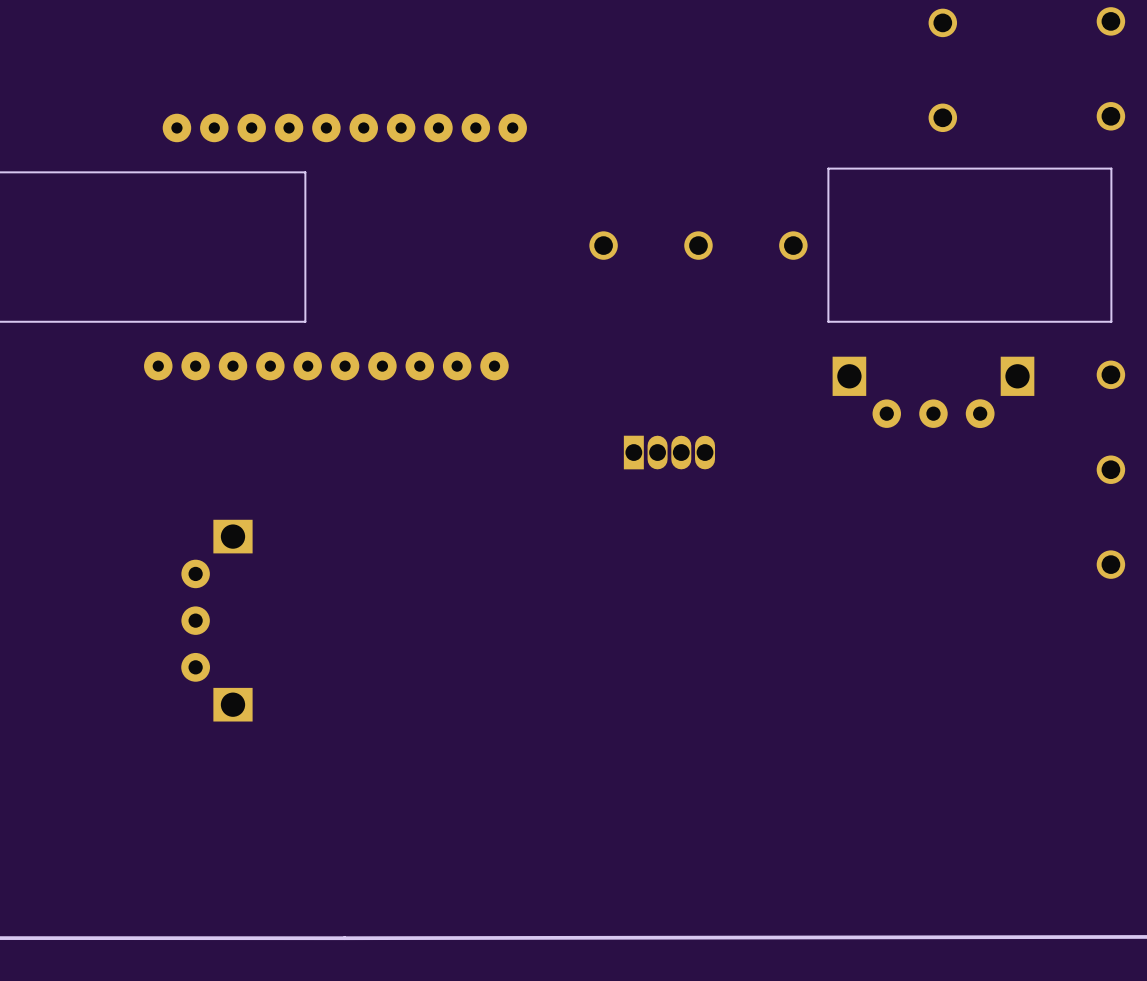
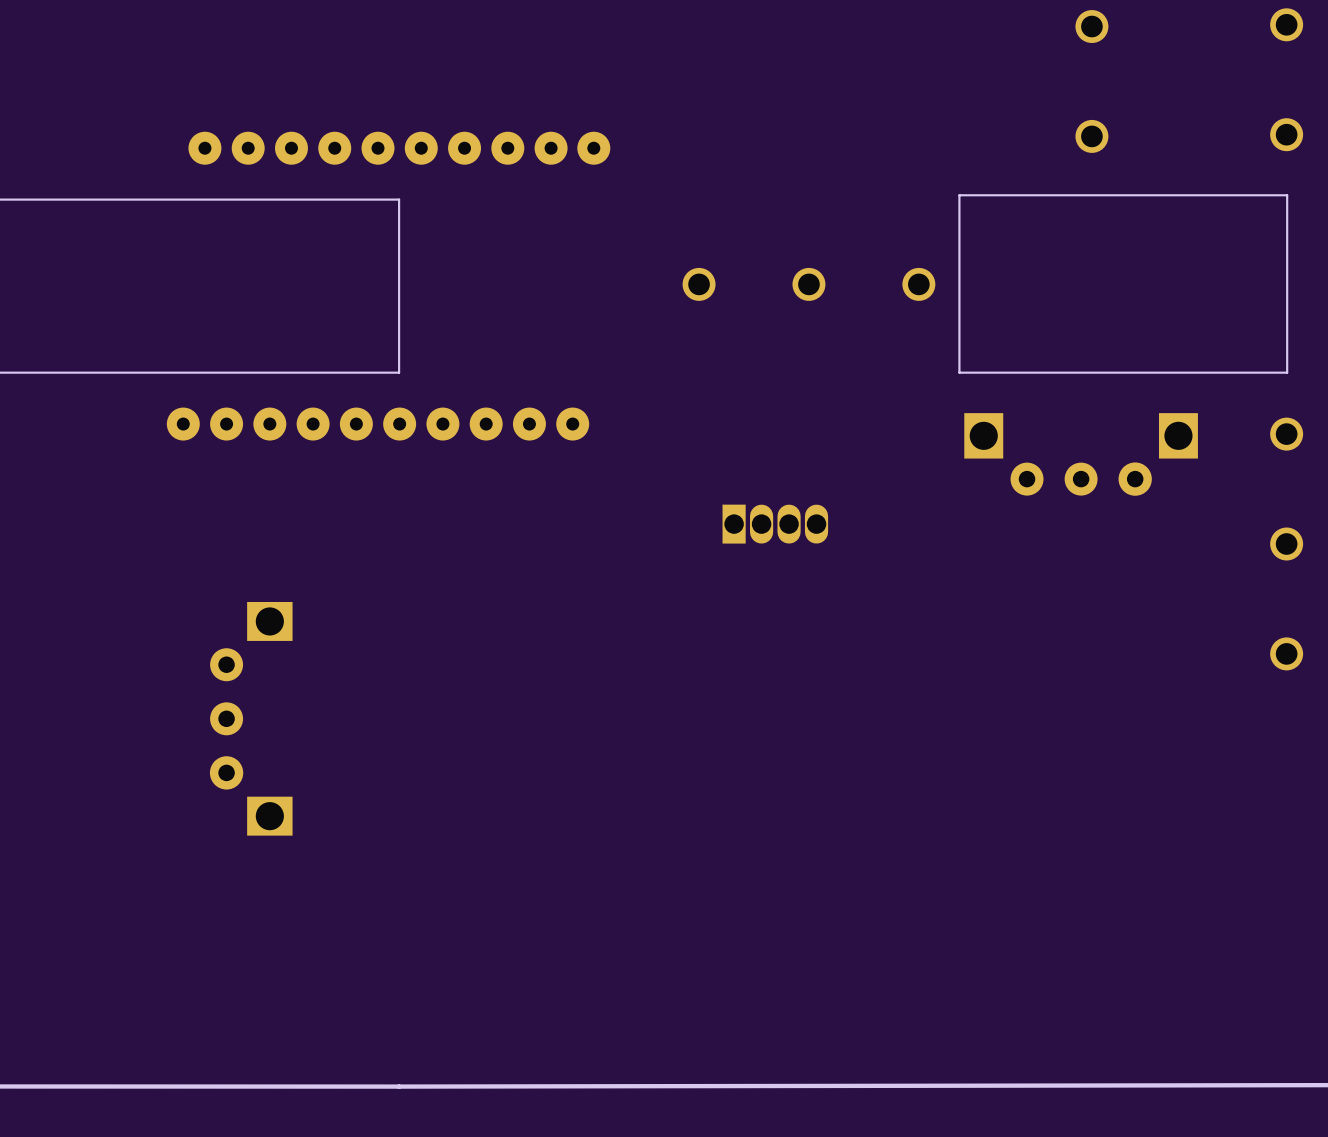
board edge: (305, 172) (305, 321) -> (353, 199) (399, 199) (399, 372) (353, 372)

